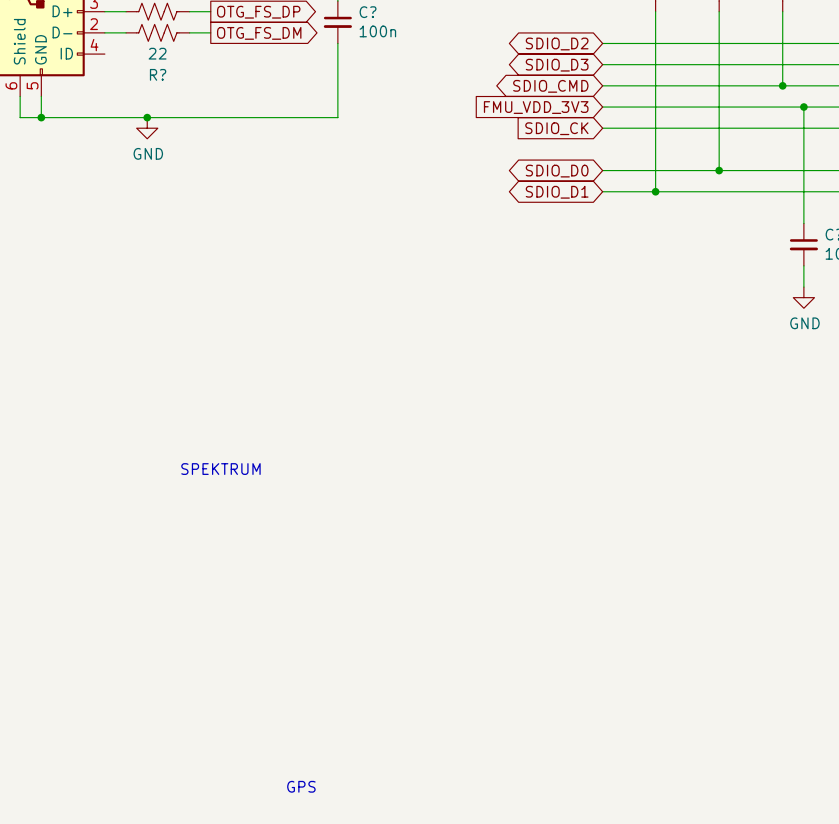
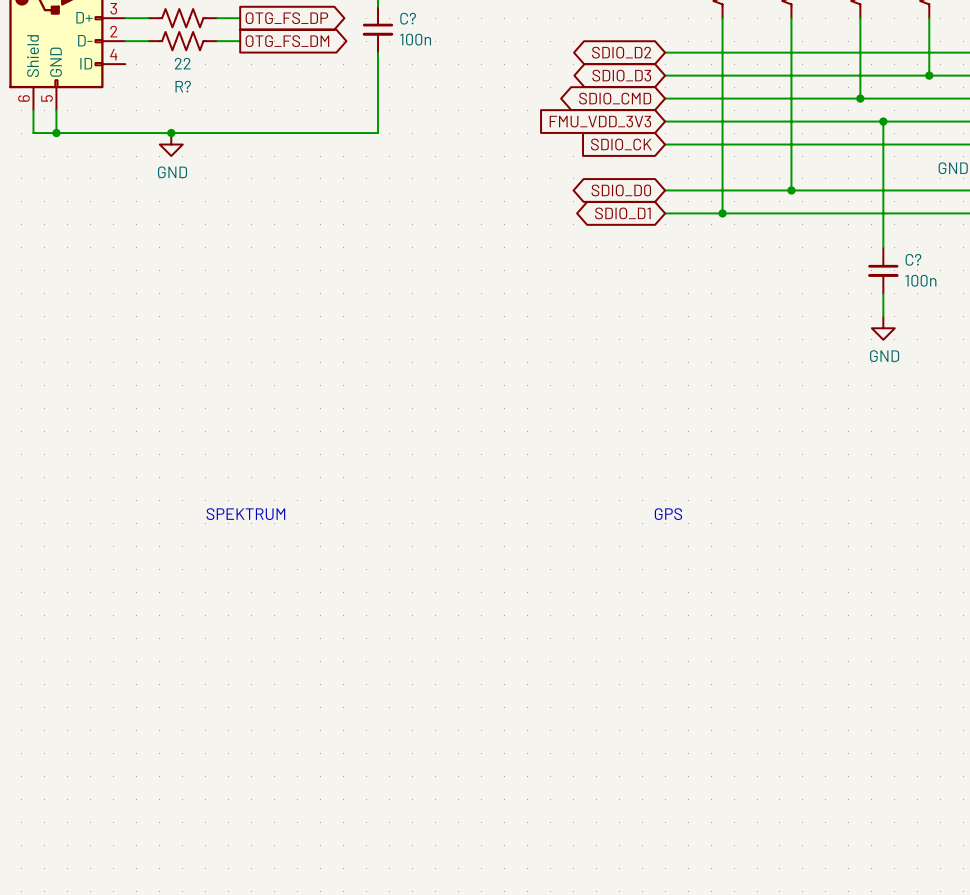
text: none -> GPS (668, 514)
text: GPS (301, 786) -> none

